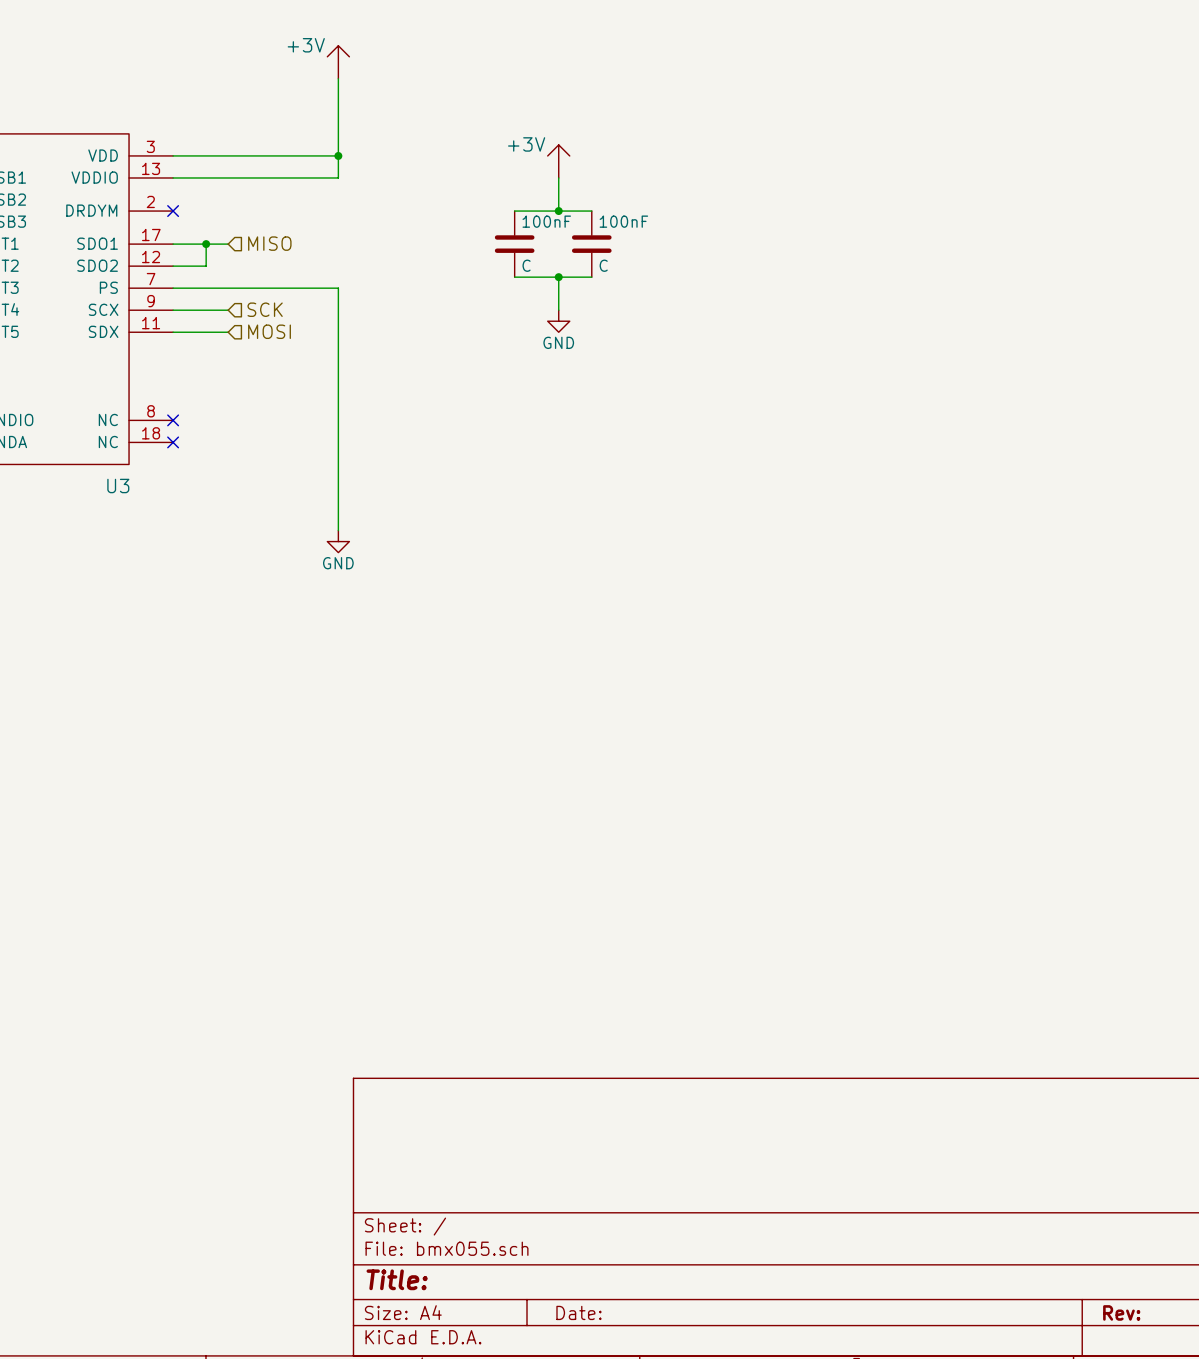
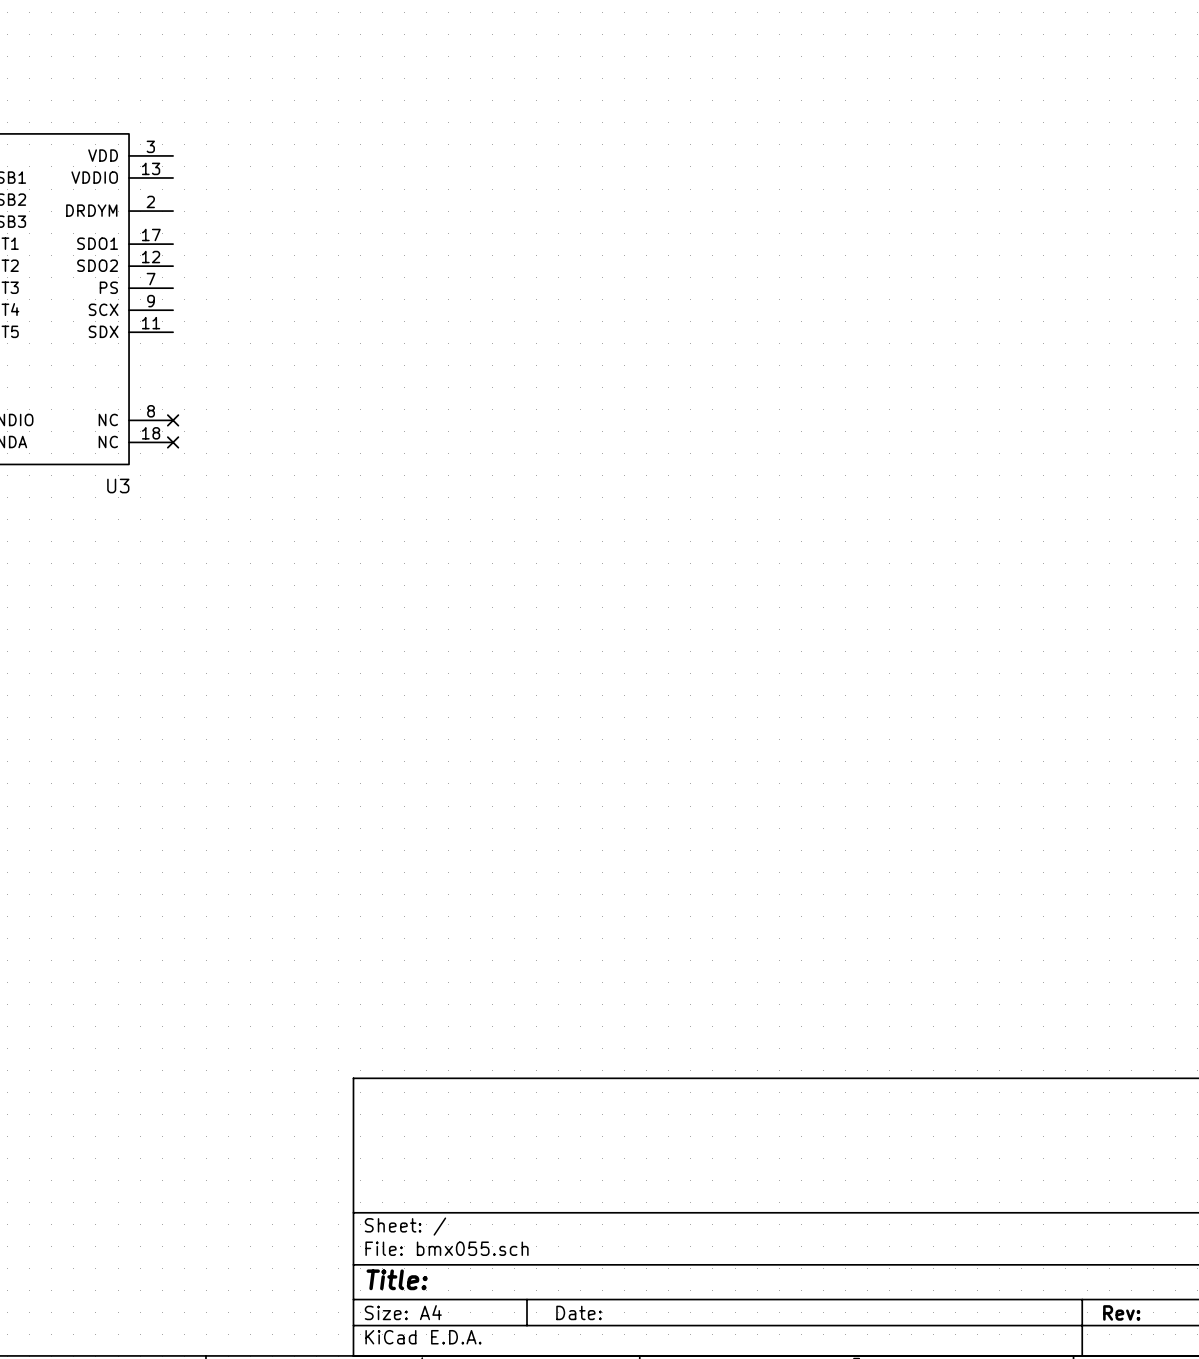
power symbol: +3V (338, 62) -> none
wire: (338, 78) (338, 177) (173, 177) -> none
wire: (173, 155) (338, 155) -> none
junction: (338, 155) -> none
power symbol: +3V (558, 161) -> none
wire: (558, 177) (558, 211) -> none
no-connect mark: (173, 211) -> none
wire: (514, 211) (591, 211) -> none
junction: (558, 211) -> none
hierarchical label: MISO (269, 243) -> none
wire: (173, 244) (228, 244) -> none
wire: (206, 244) (206, 266) (173, 266) -> none
junction: (206, 244) -> none
100nF: C (514, 244) -> none
100nF: C (591, 244) -> none
wire: (514, 277) (591, 277) -> none
wire: (558, 277) (558, 310) -> none
junction: (558, 277) -> none
wire: (173, 288) (338, 288) (338, 530) -> none
hierarchical label: SCK (265, 309) -> none
wire: (173, 310) (228, 310) -> none
power symbol: GND (558, 321) -> none
hierarchical label: MOSI (269, 331) -> none
wire: (173, 332) (228, 332) -> none
power symbol: GND (338, 541) -> none

